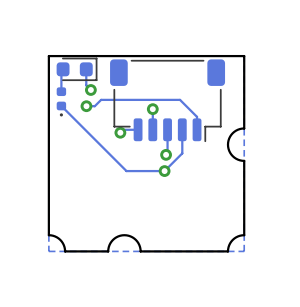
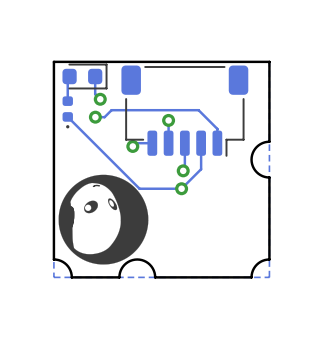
drawing: none -> [58, 174, 149, 265]

